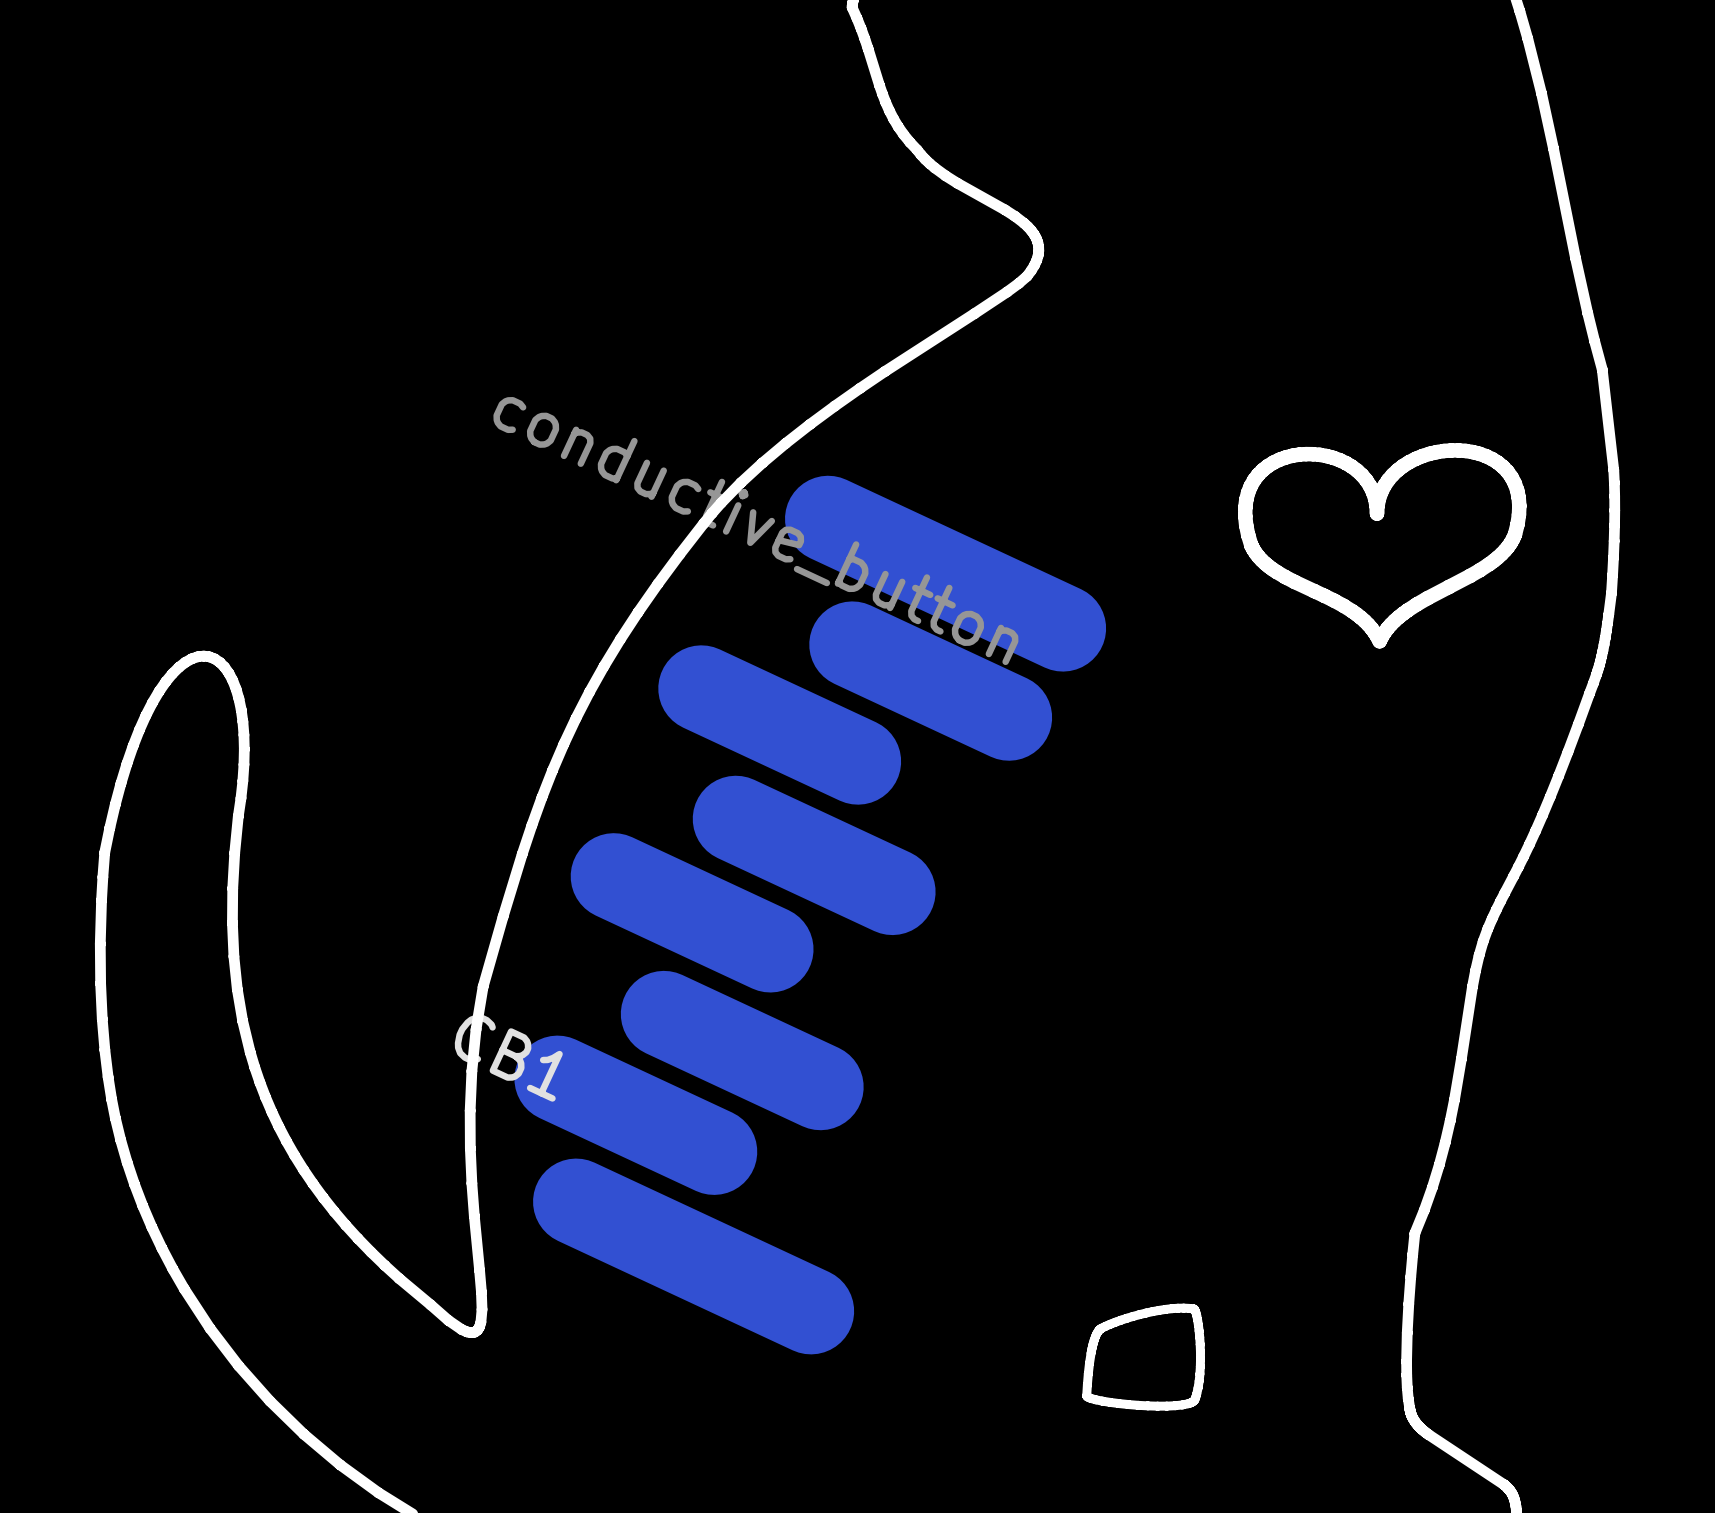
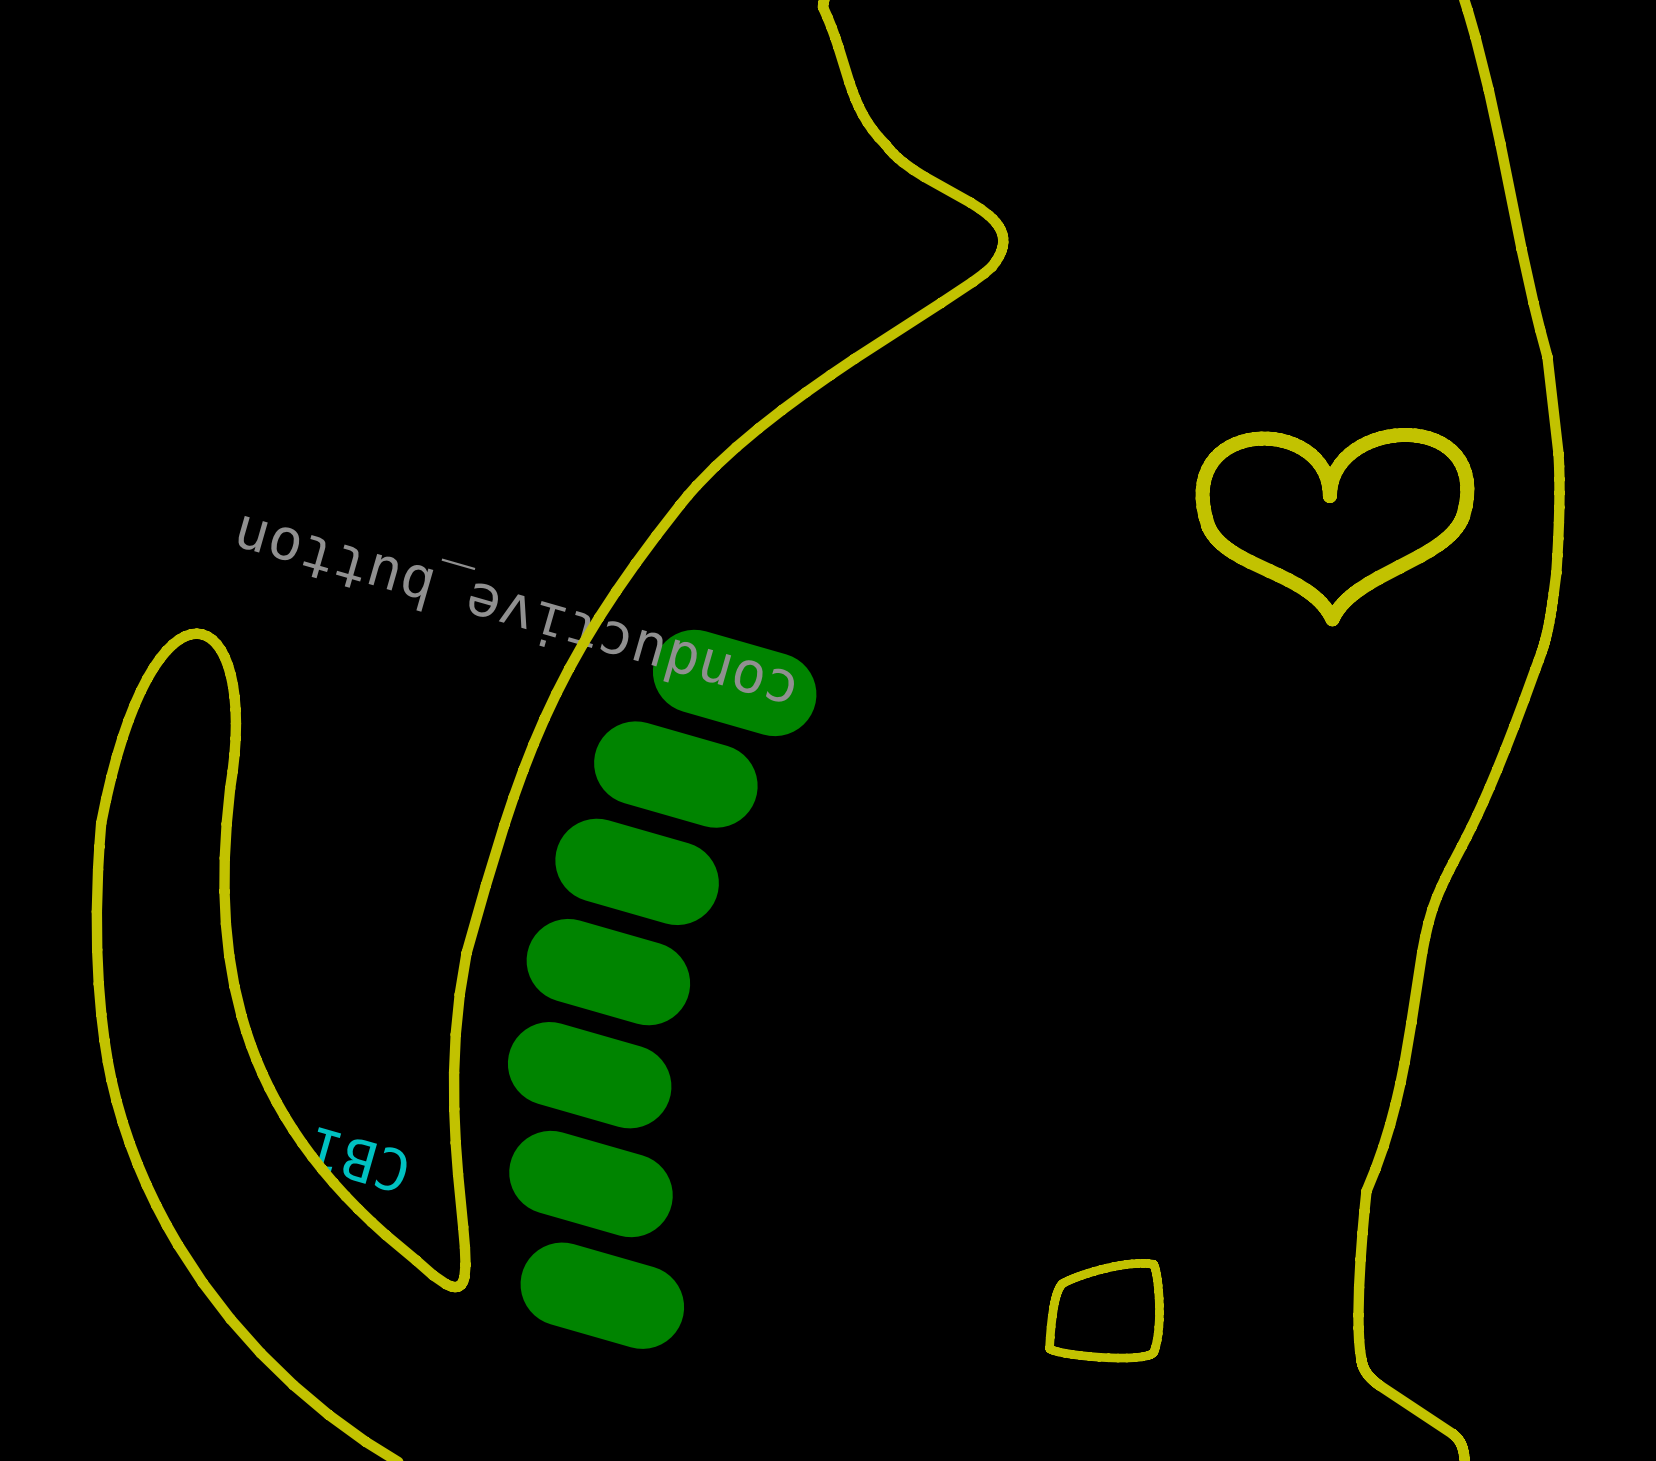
CB1 footprint: [514, 475, 1107, 1355] -> [507, 629, 817, 1349]
CB1 value position: conductive_button (755, 531) -> conductive_button (516, 609)

